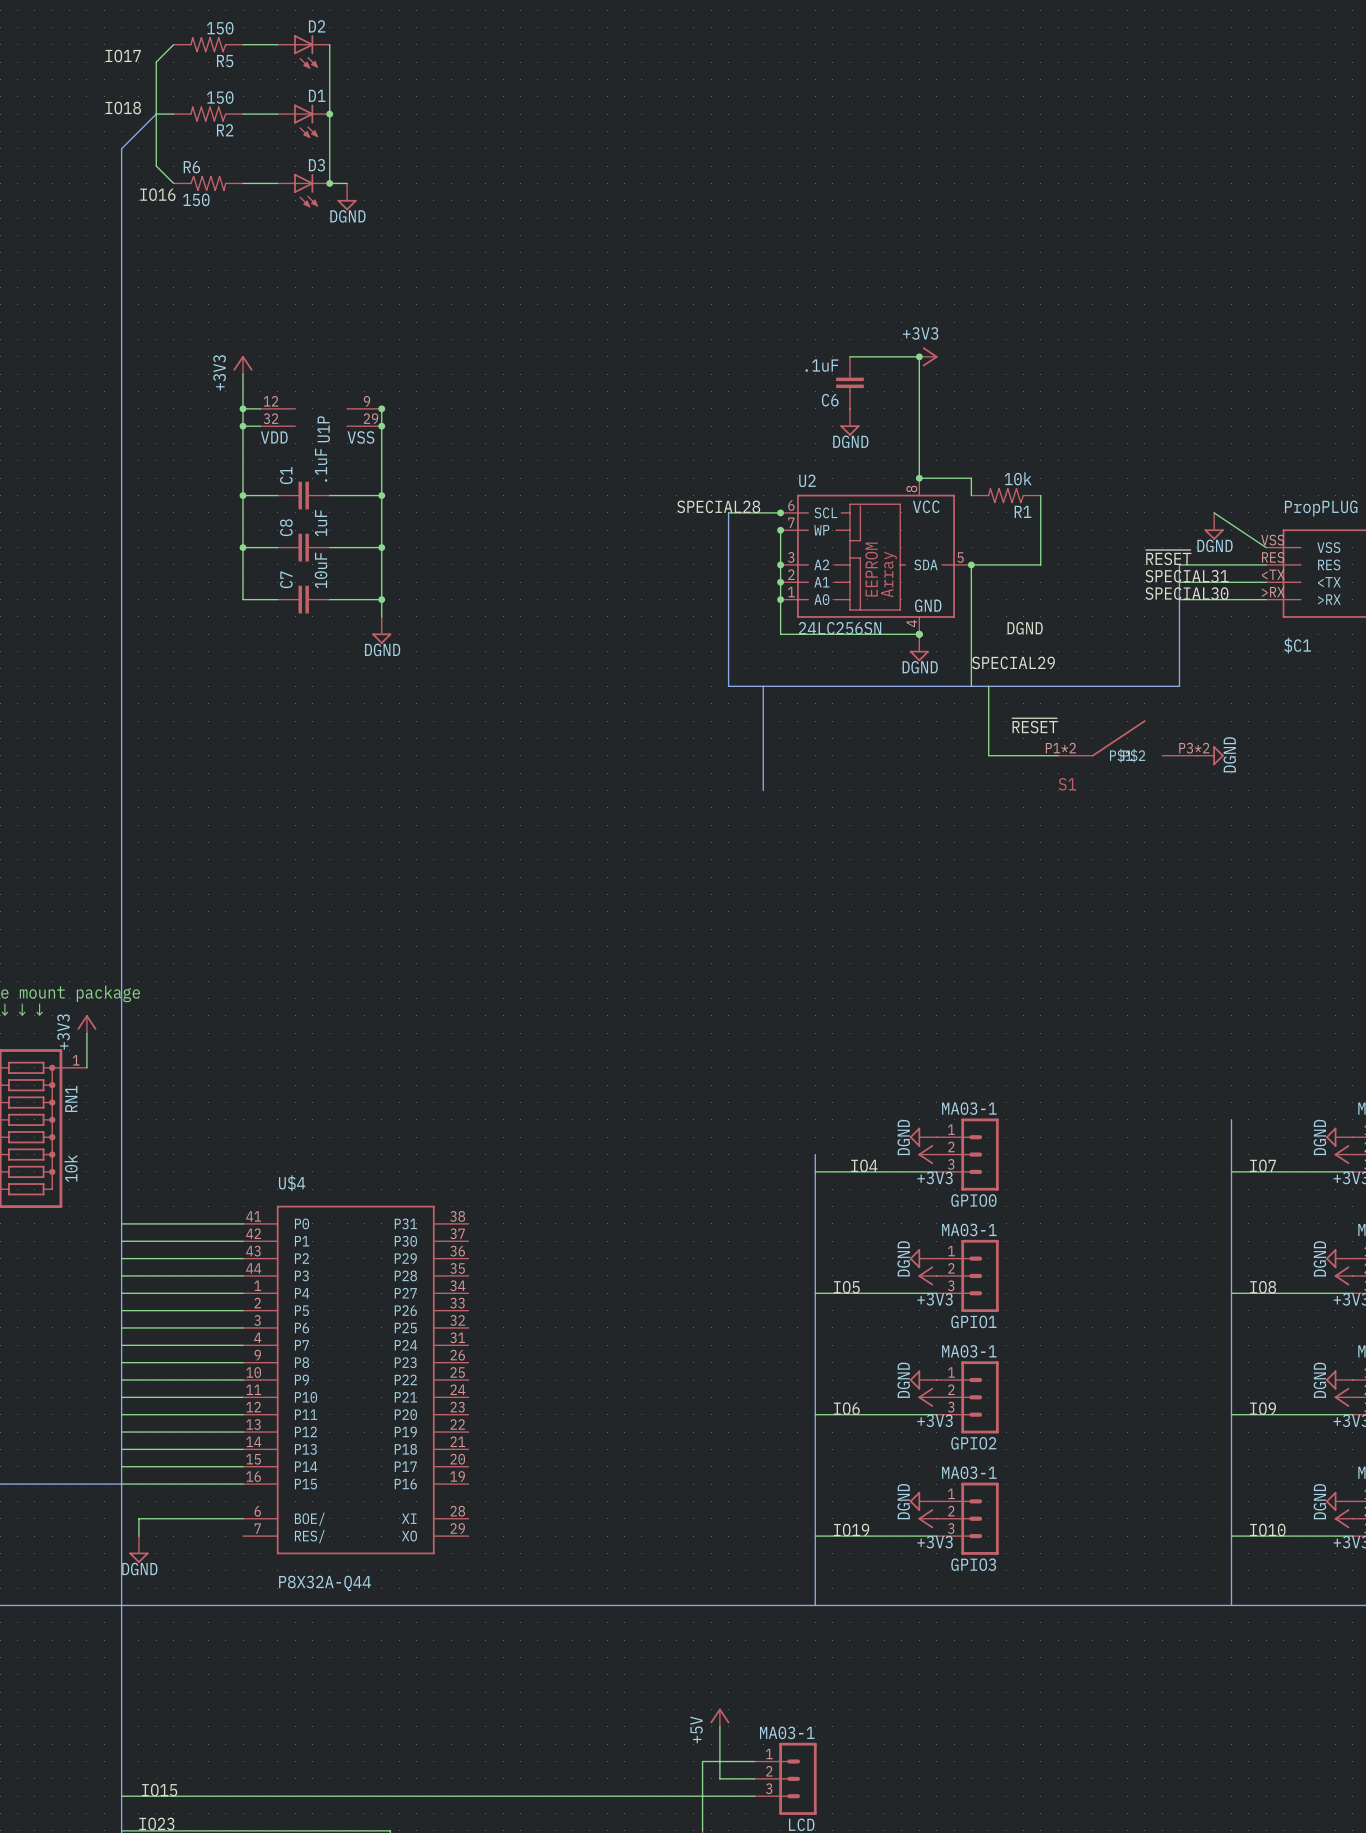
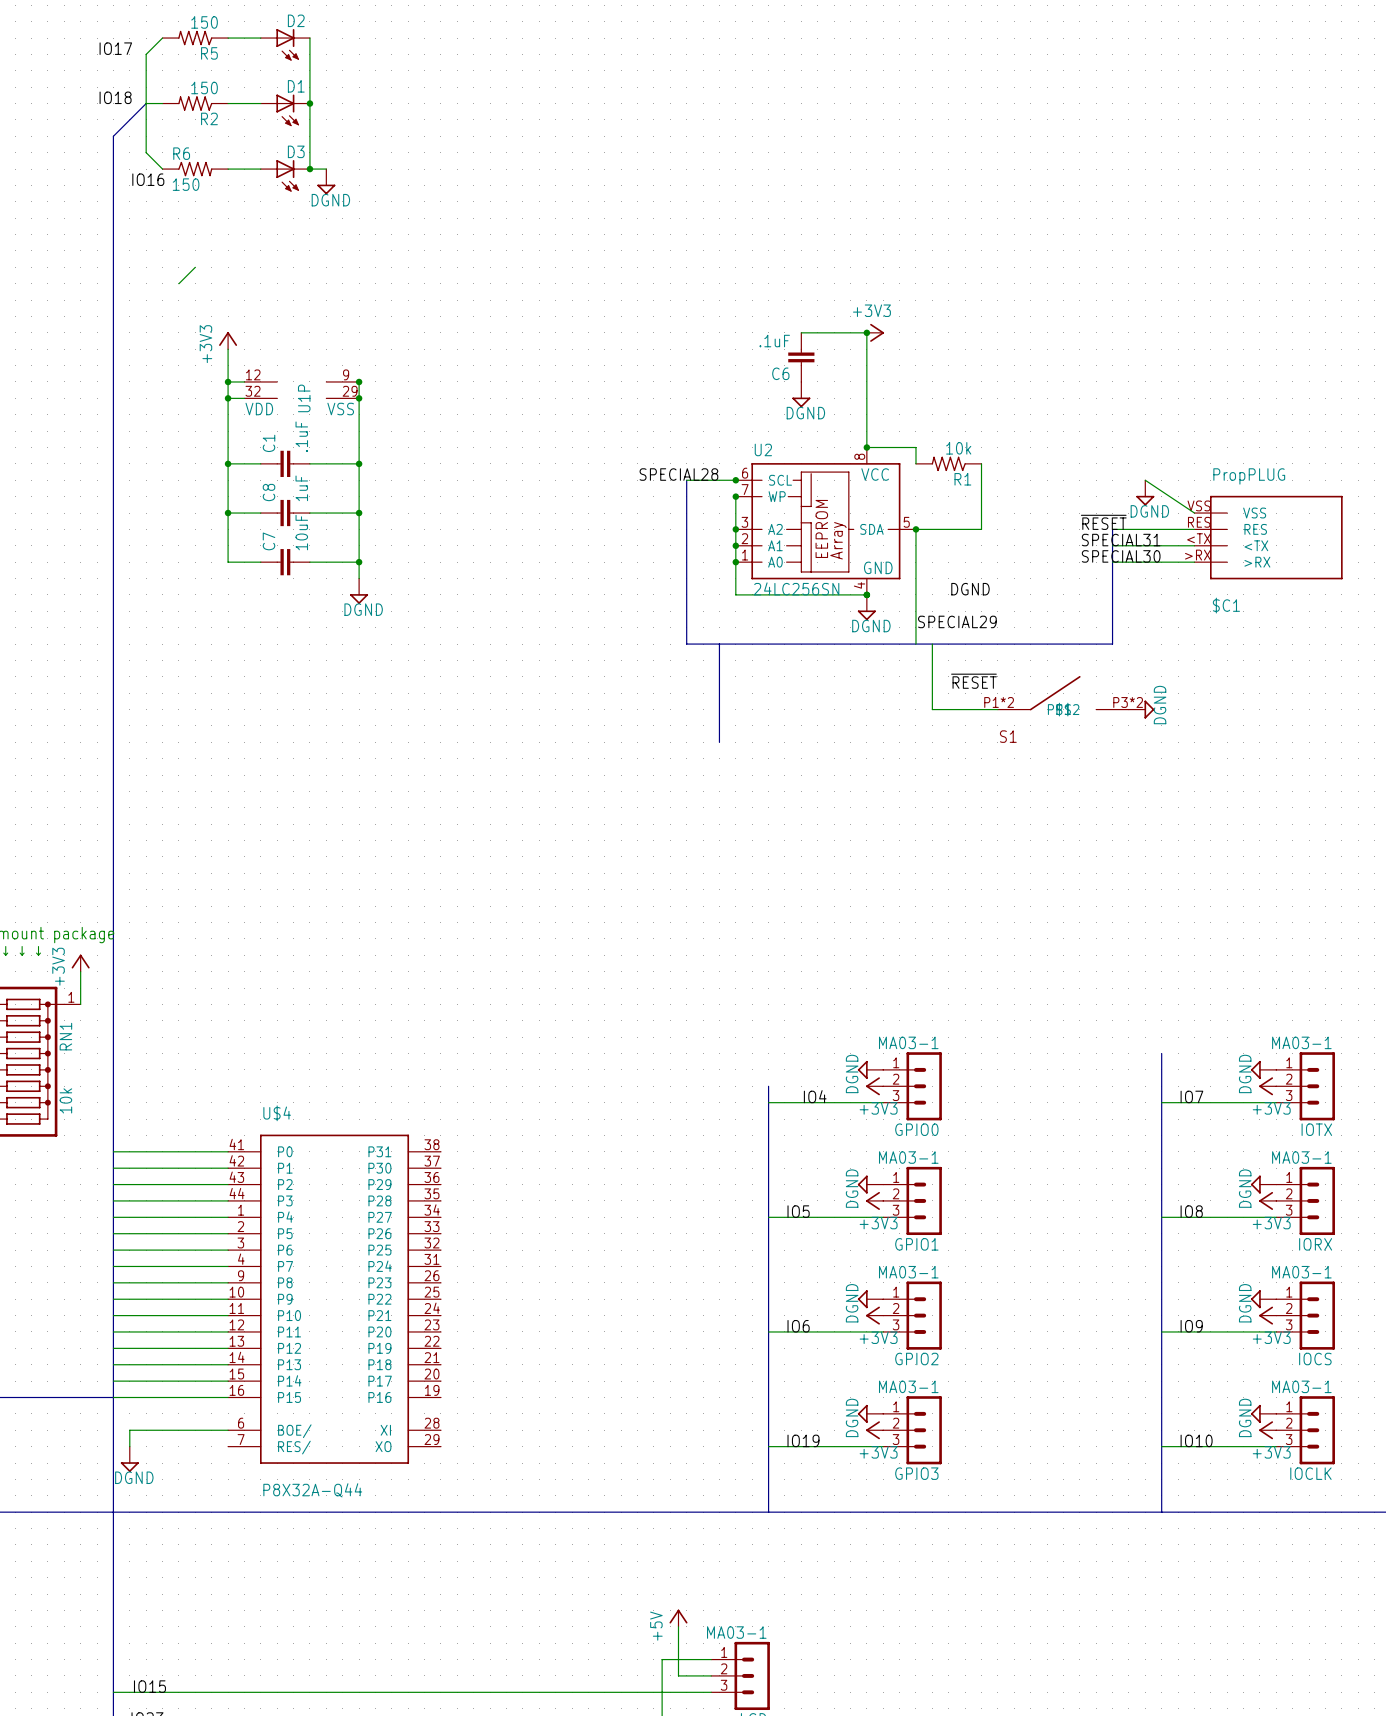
wire: none -> (195, 267) (178, 283)

